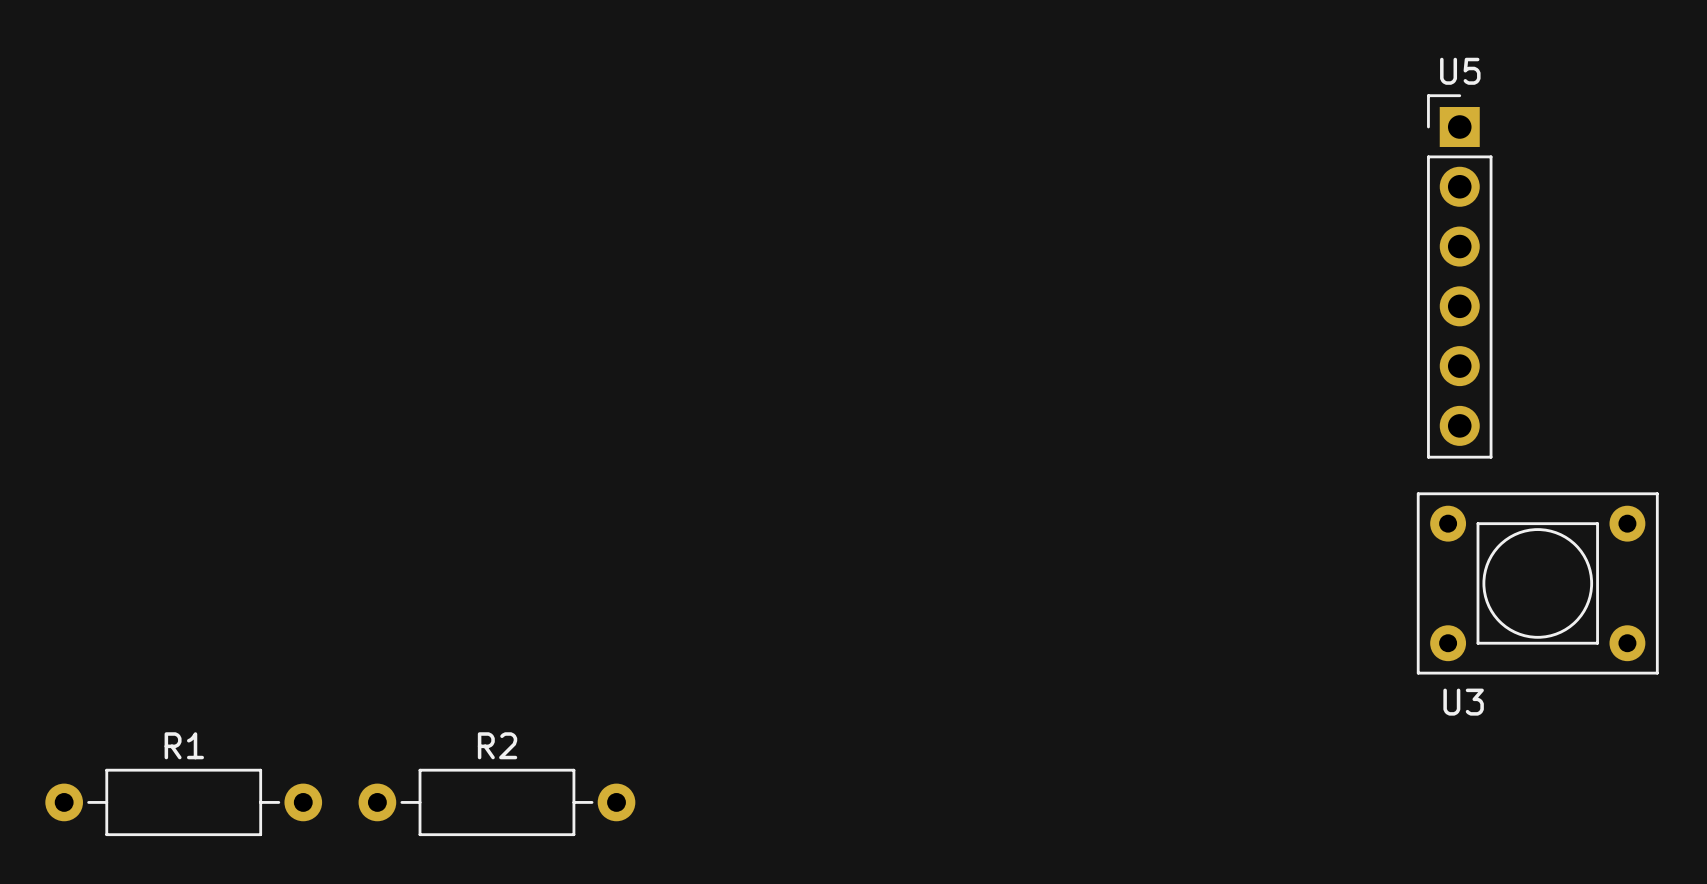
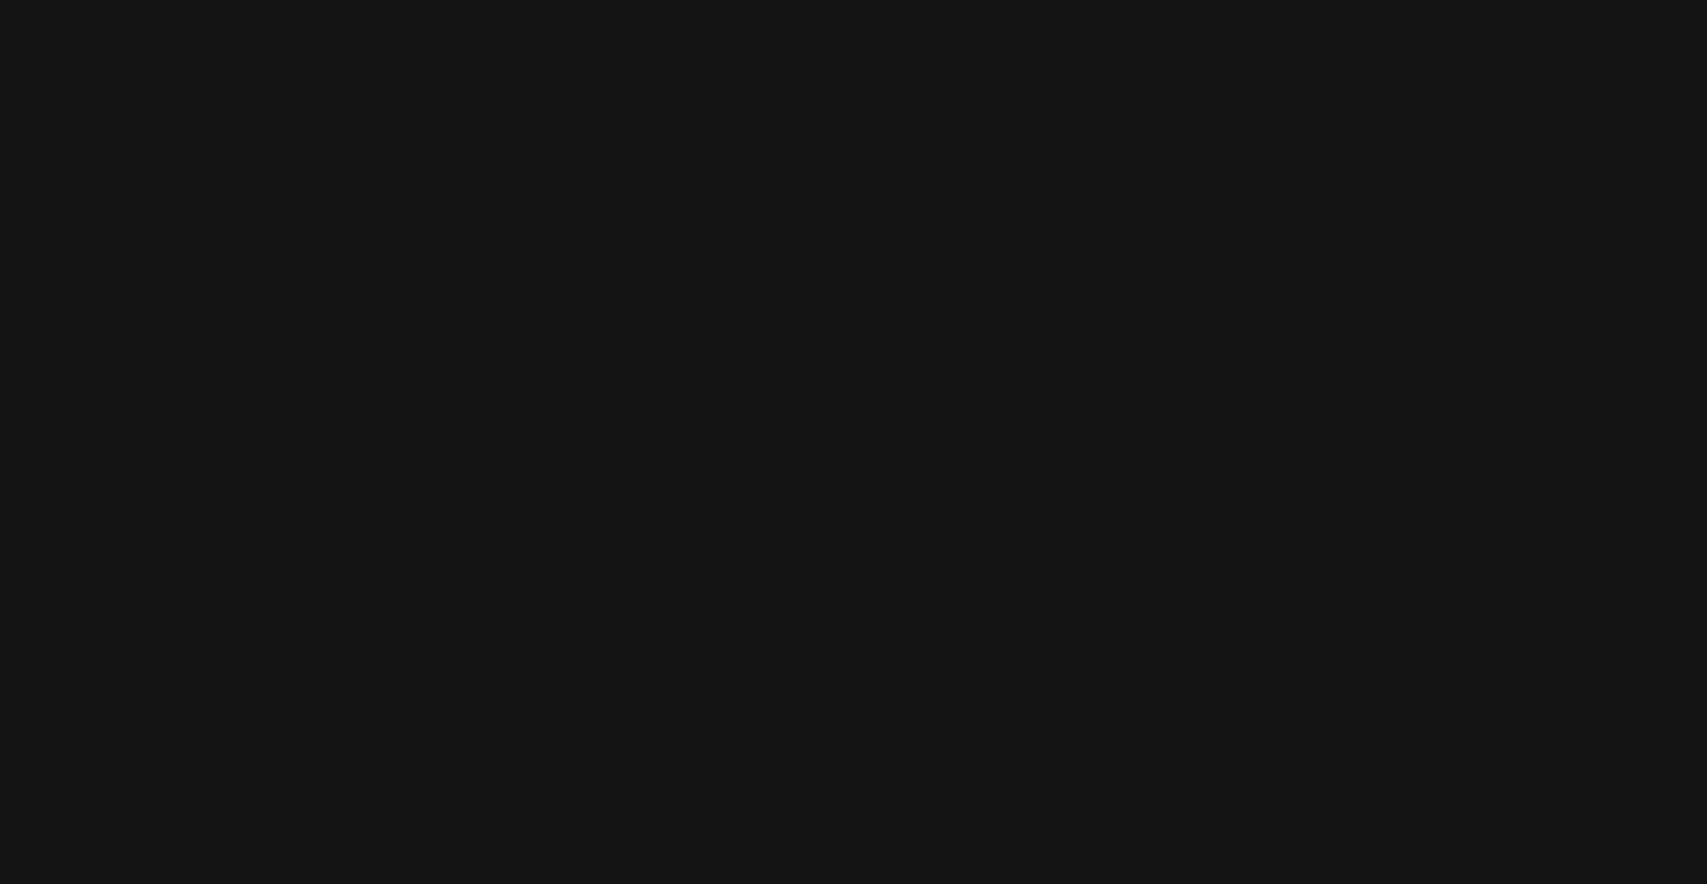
U5: (1459, 276) -> none
U3: (1537, 583) -> none
R1: (183, 802) -> none
R2: (496, 802) -> none

